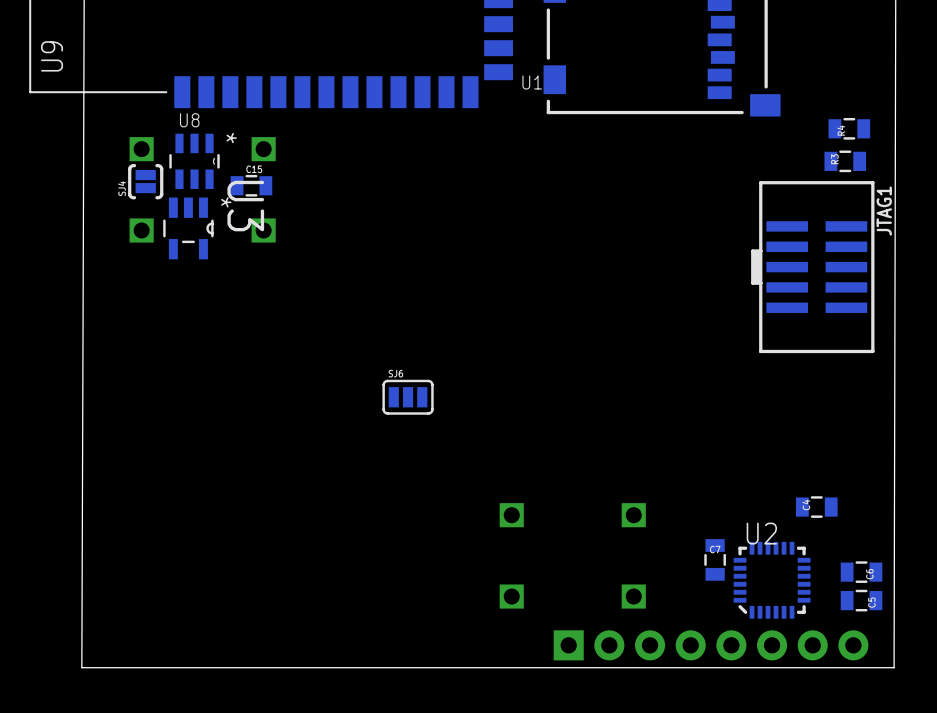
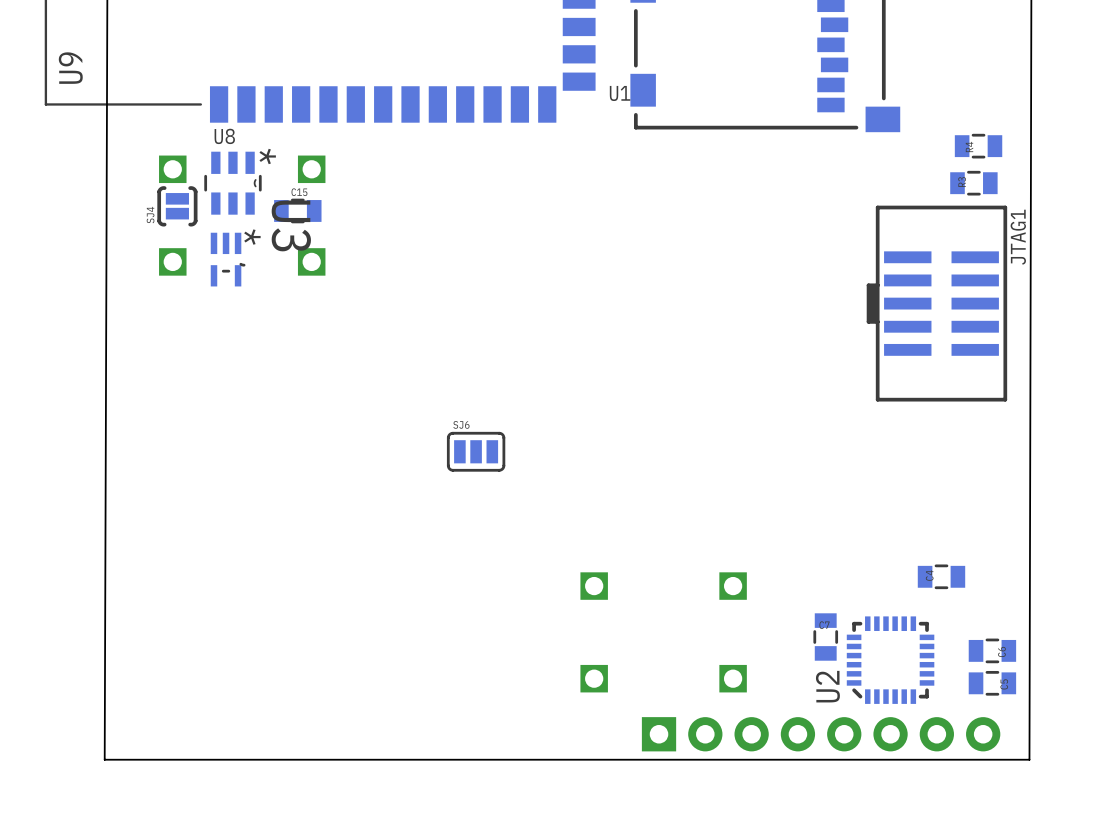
U3 footprint: [163, 197, 214, 260] -> [210, 232, 246, 287]
U2 name rotation: 0° (761, 533) -> 90° counterclockwise (827, 686)
U2 name position: U2 (761, 533) -> U2 (827, 686)

